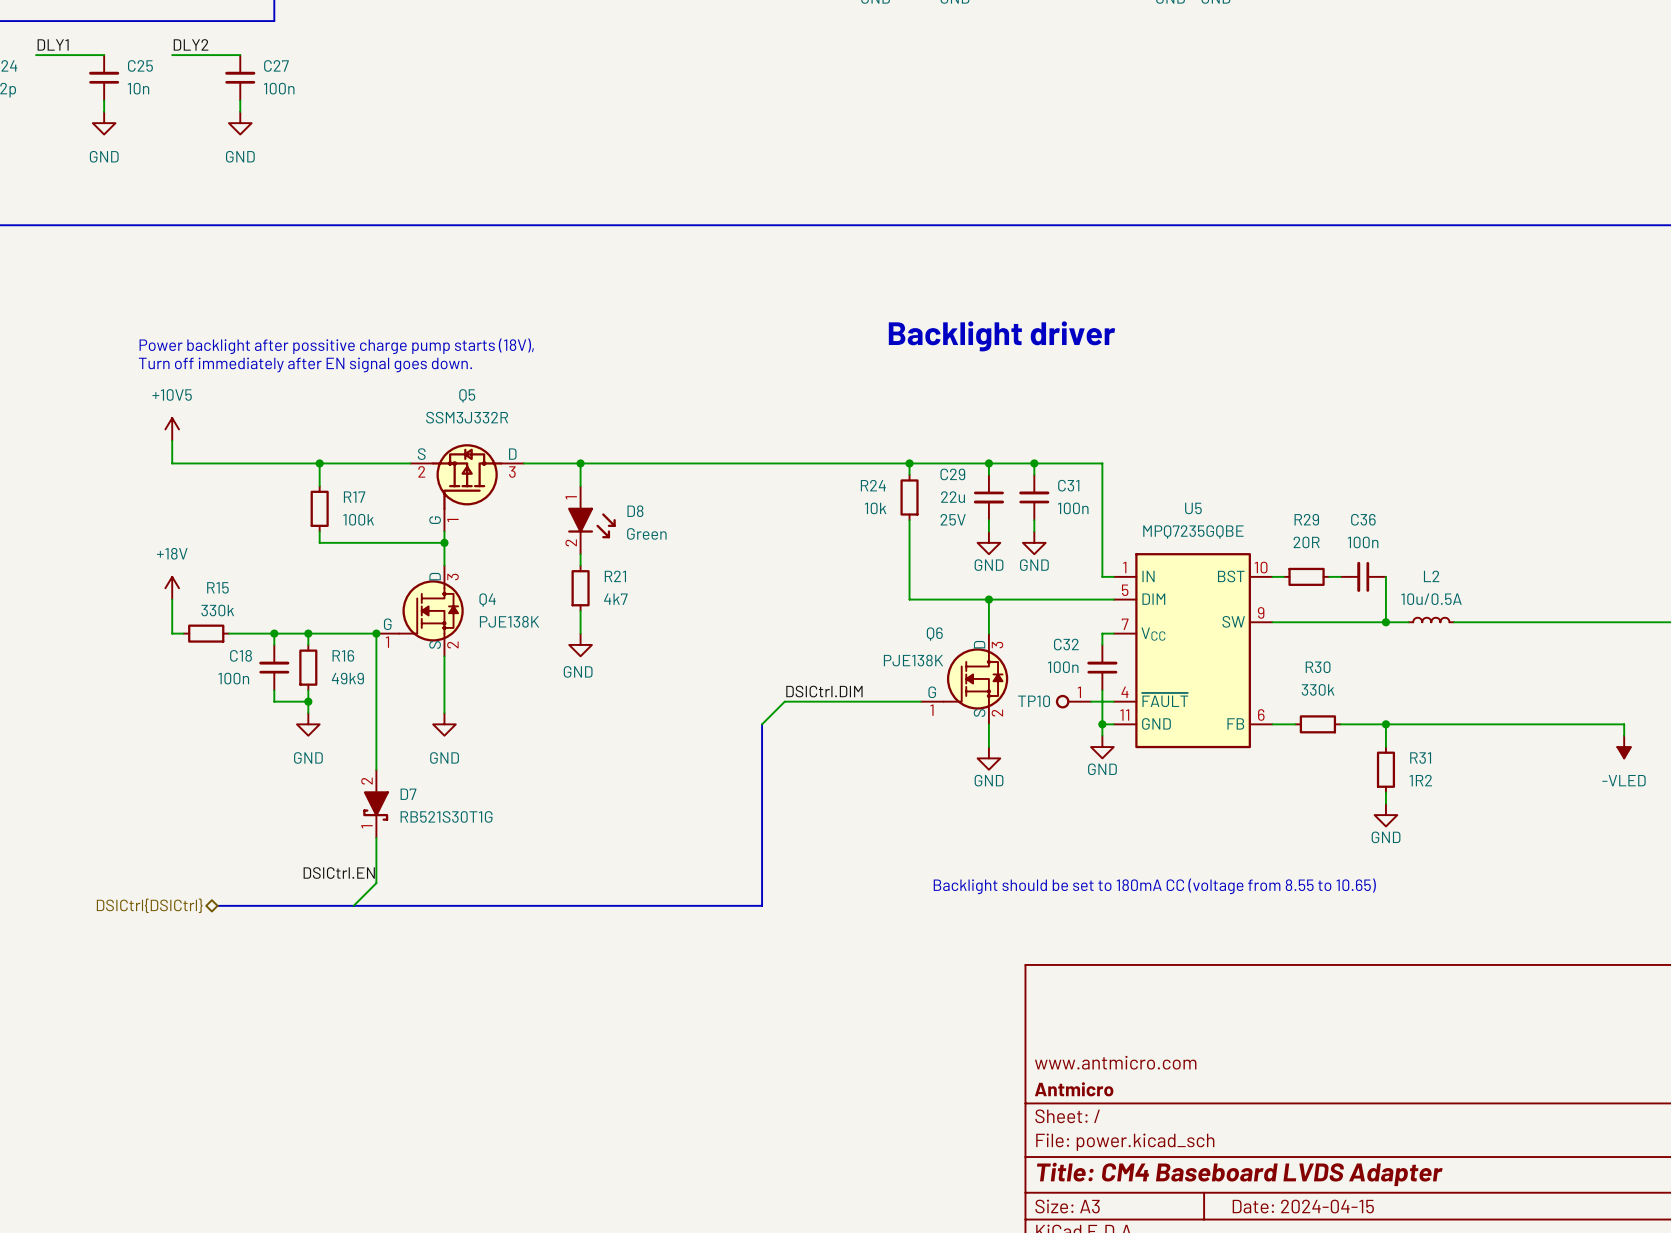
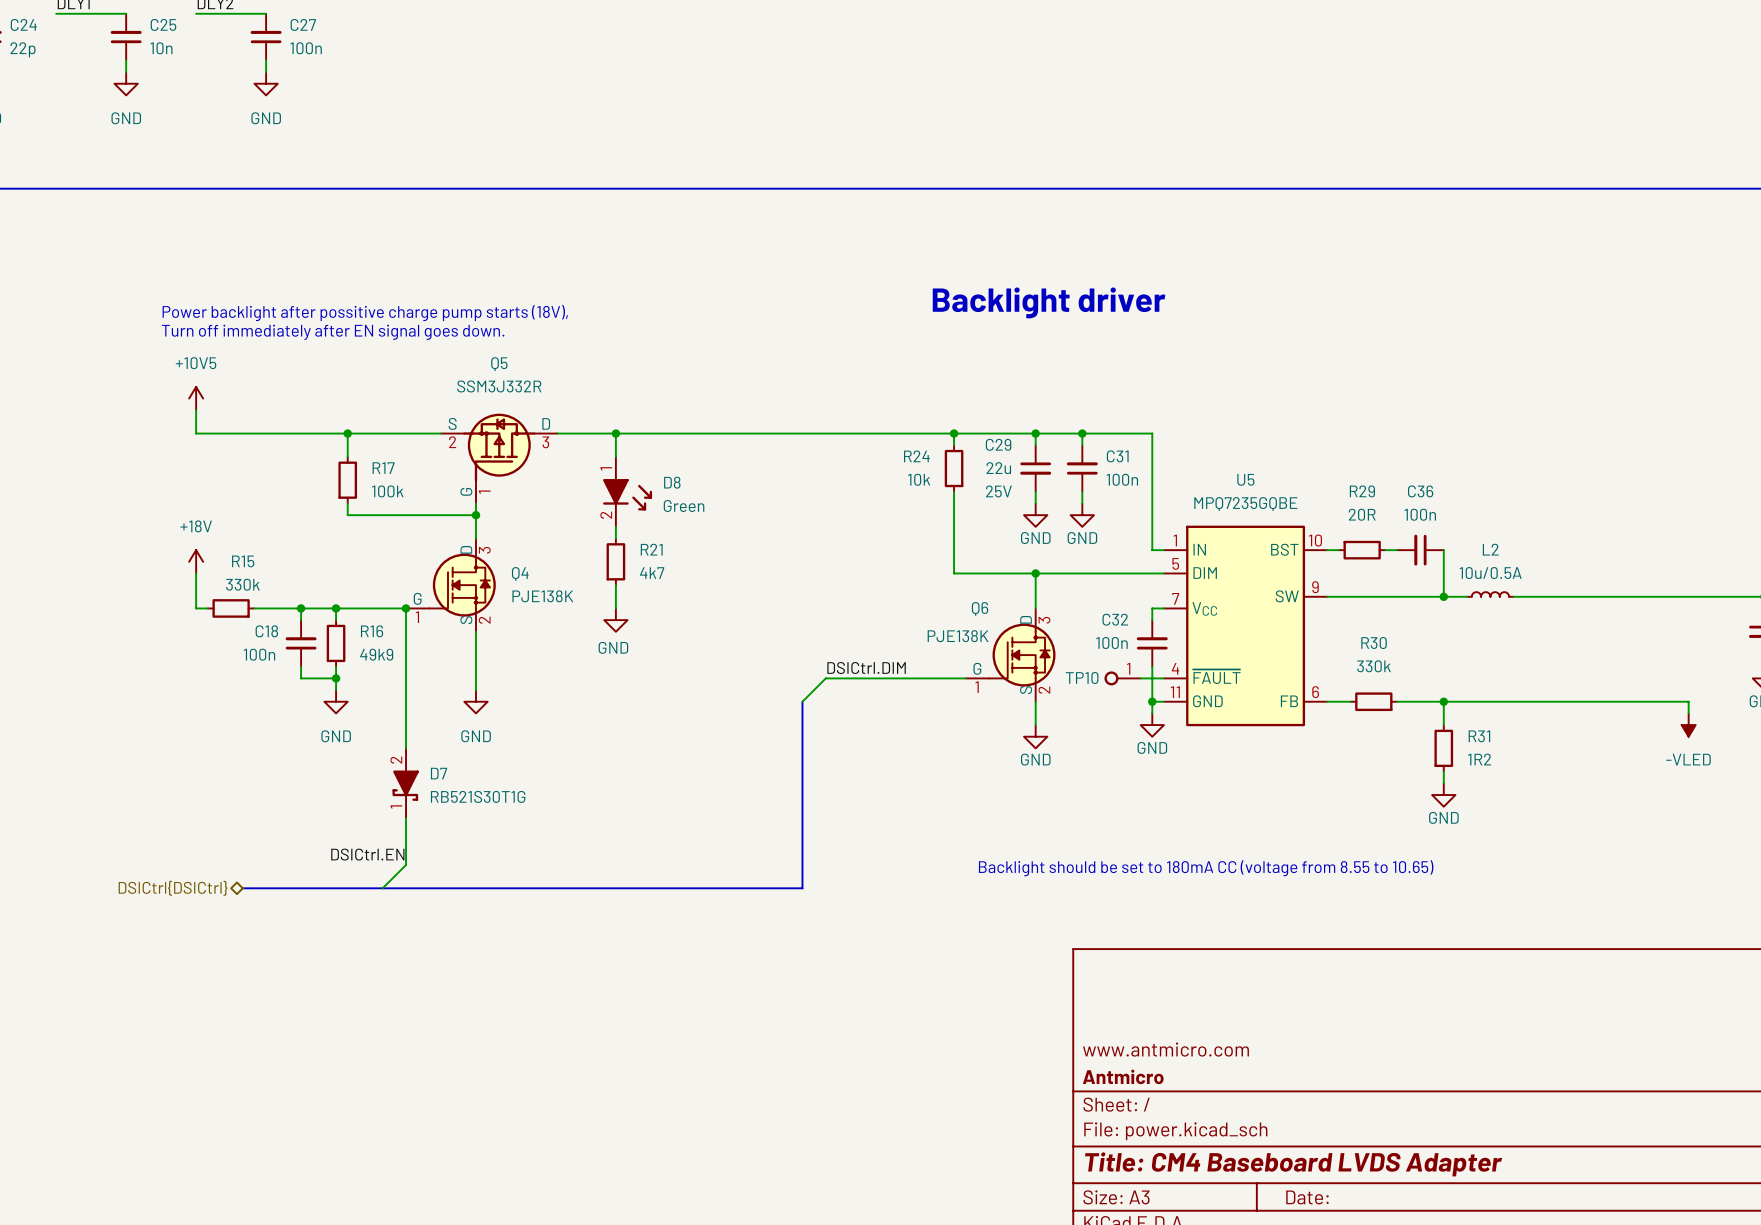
title block: Date: 2024-04-15 (1303, 1206) -> Date: (1307, 1197)

